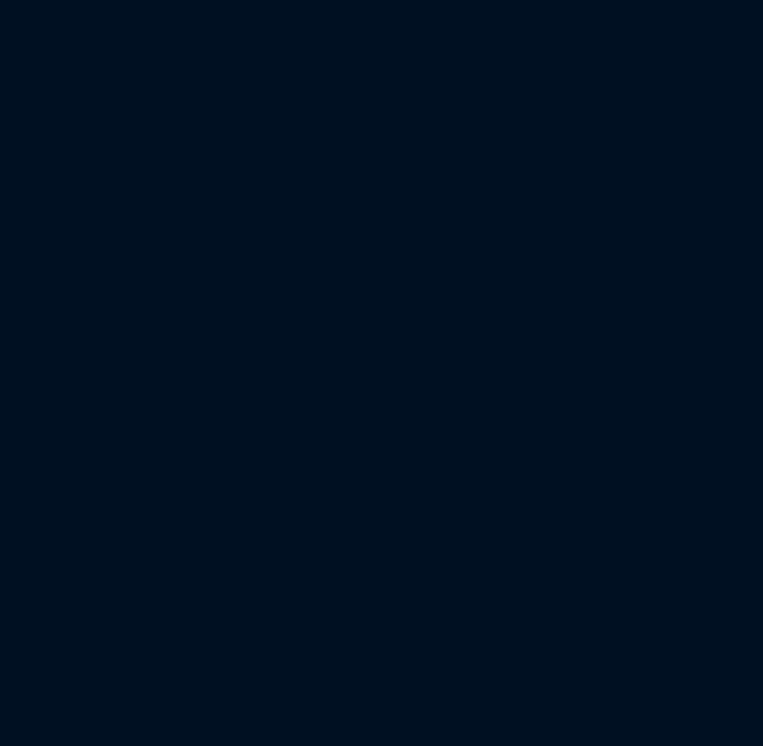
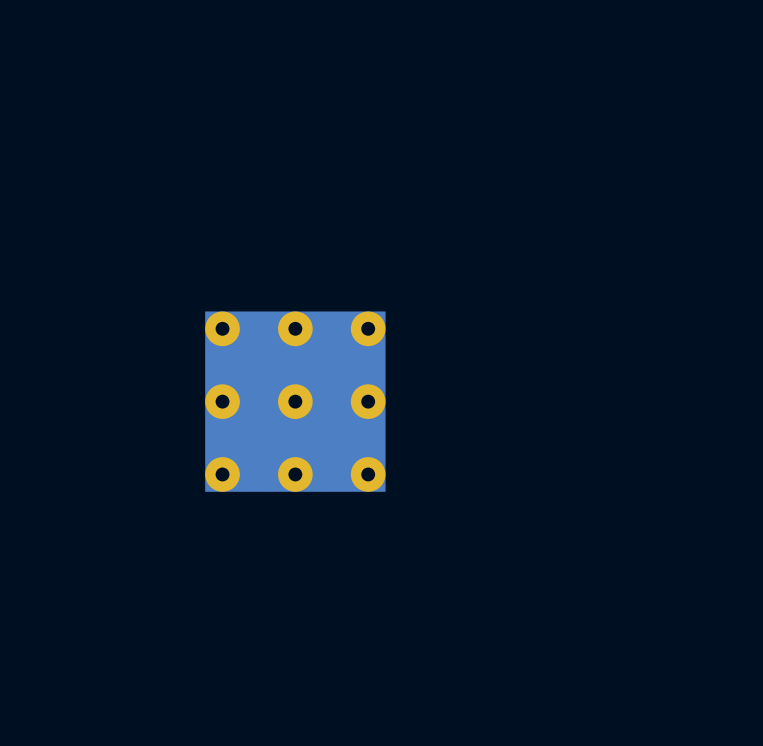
part: none -> (295, 401)

